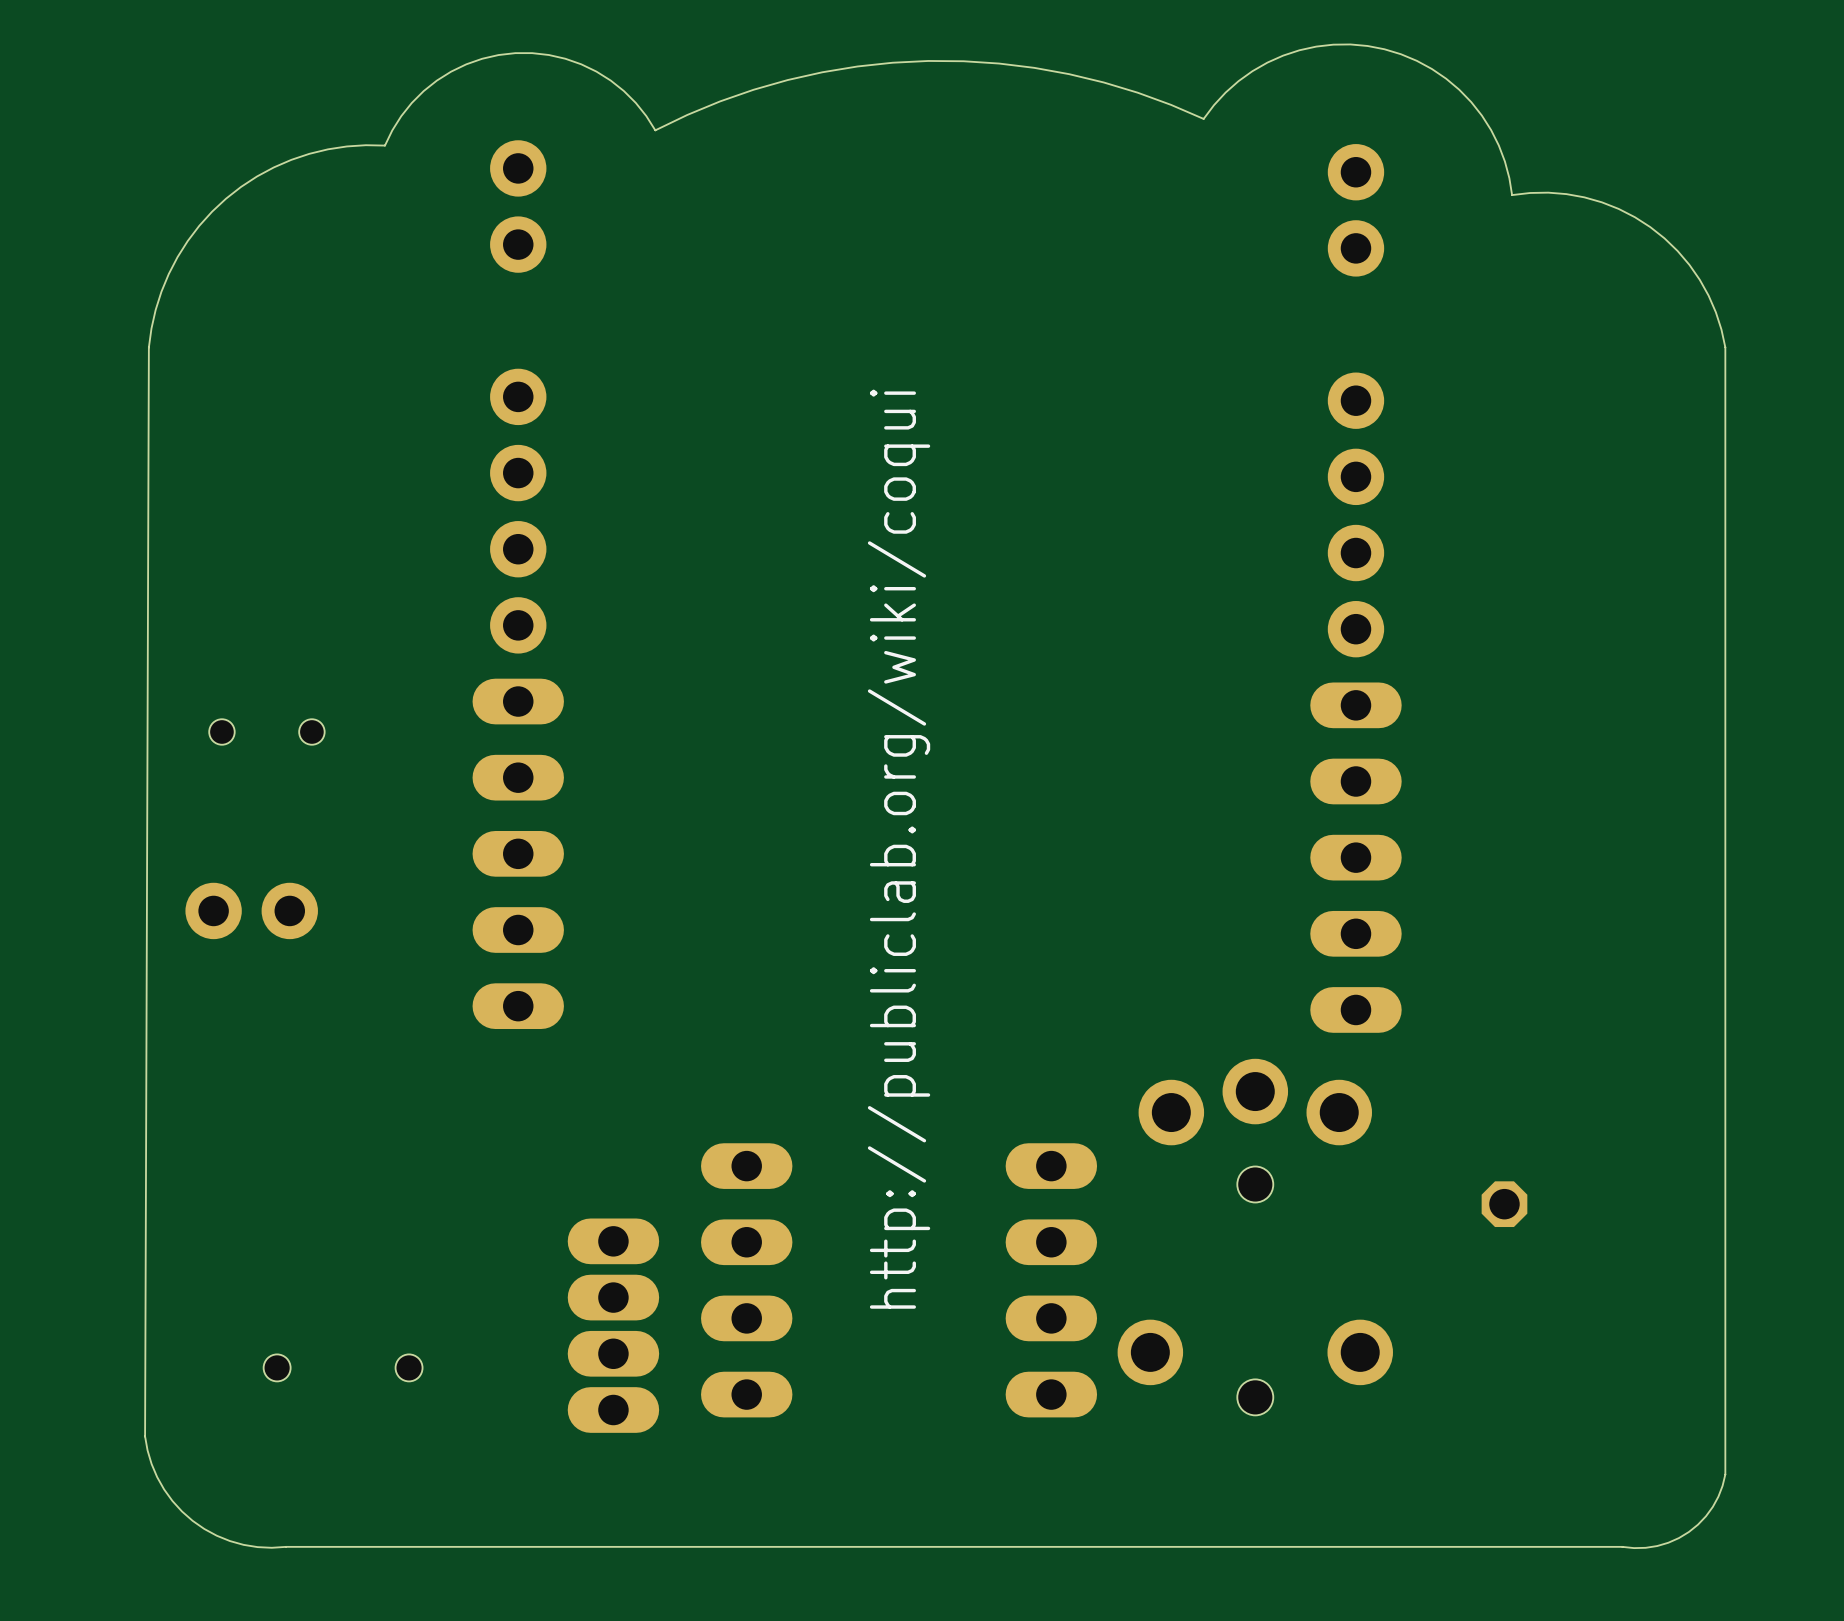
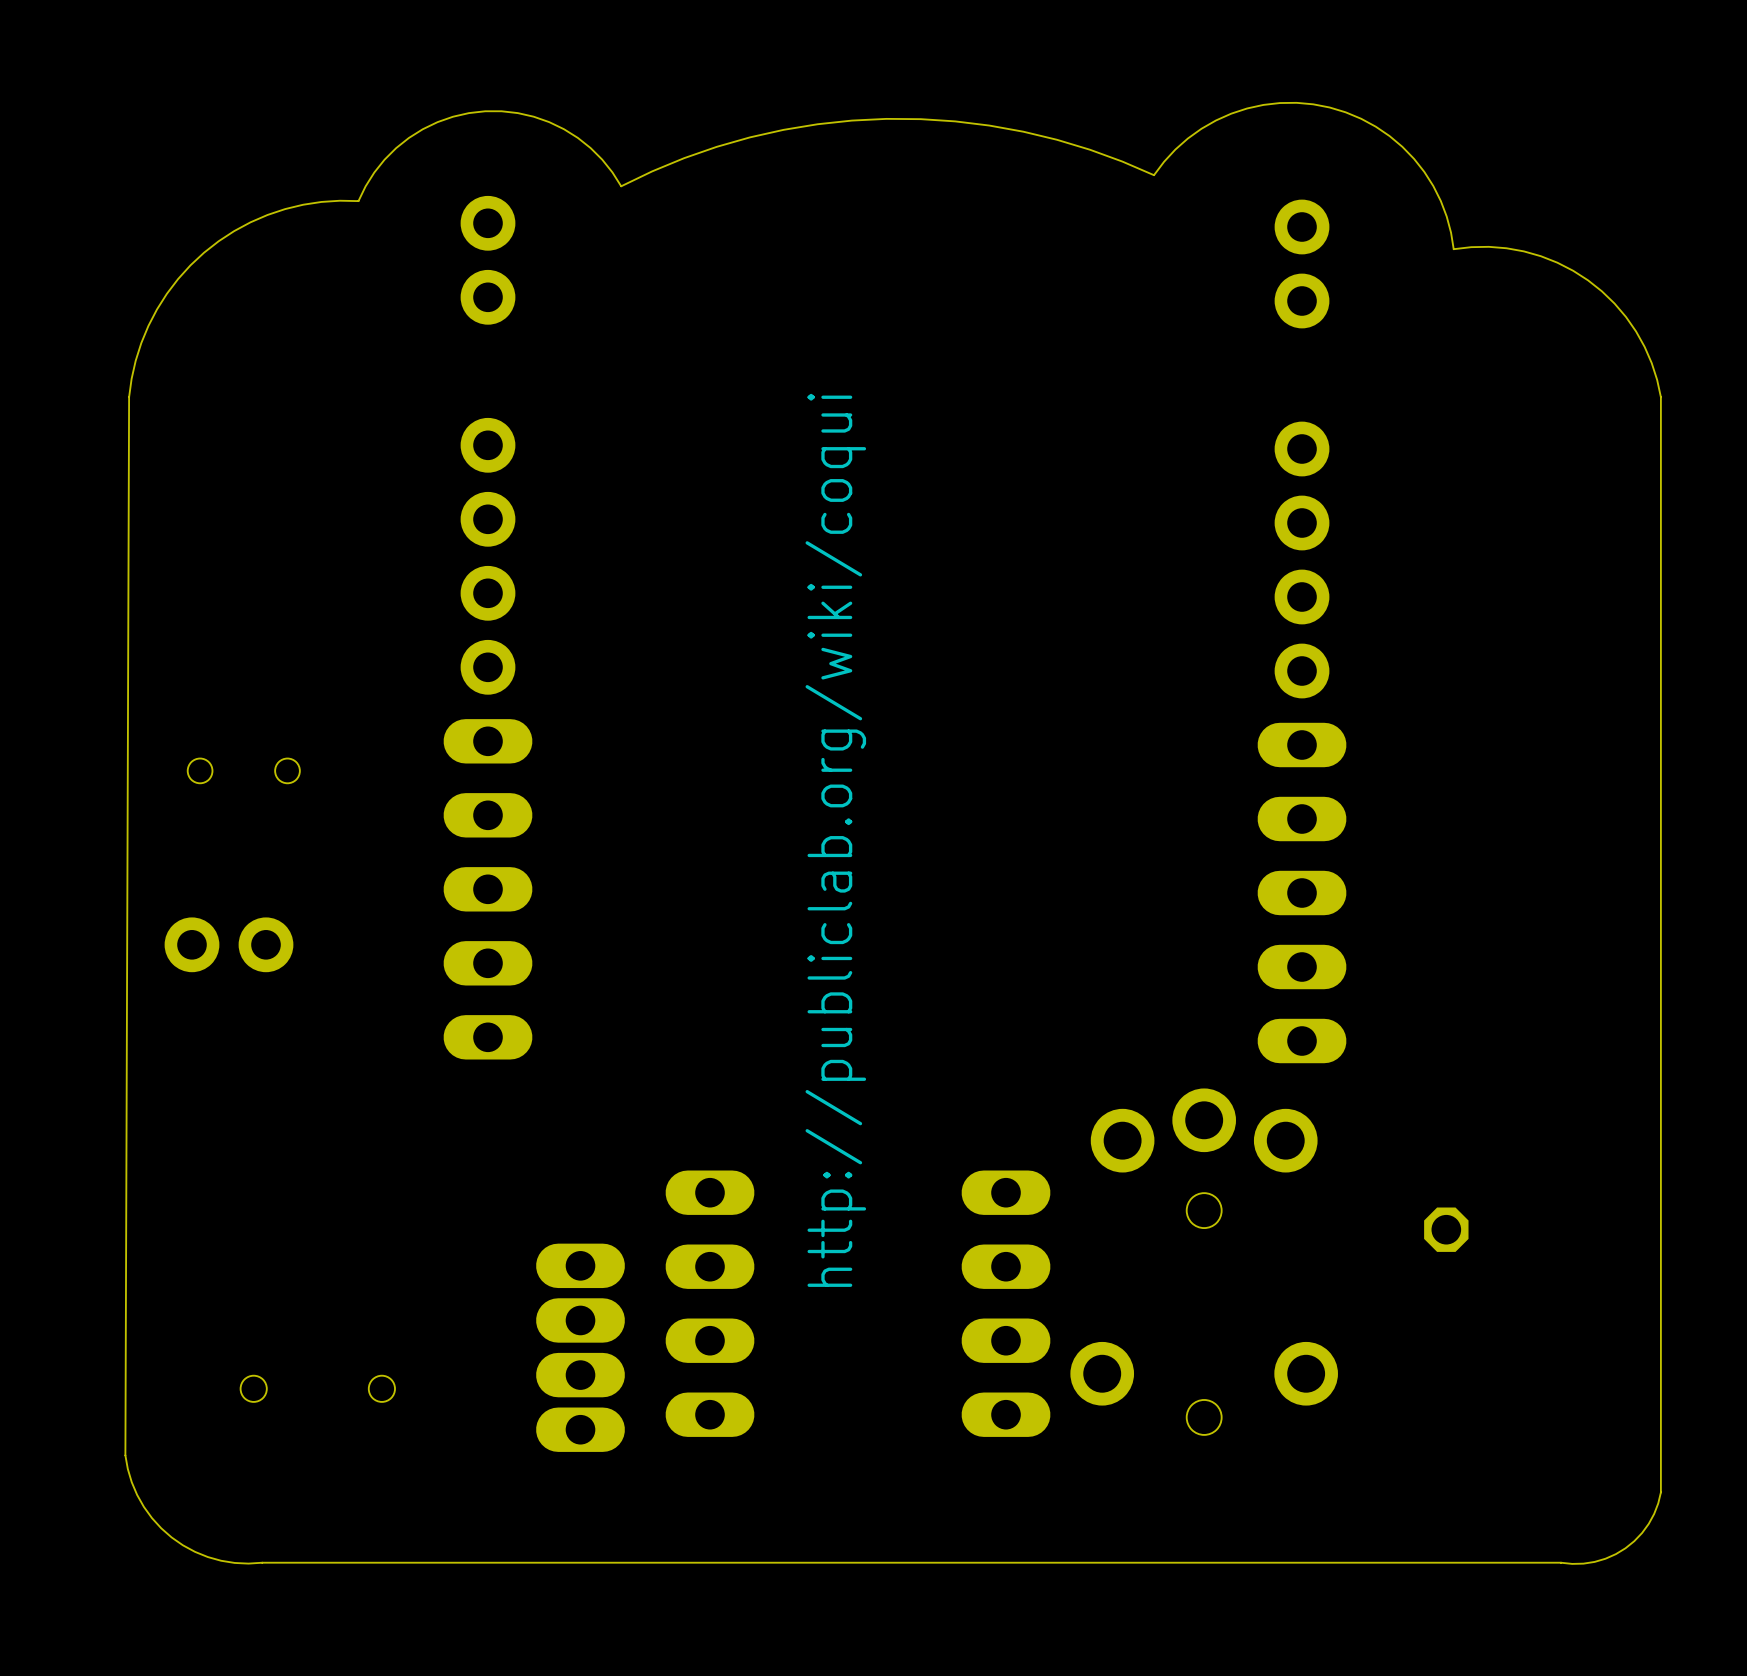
text position: http://publiclab.org/wiki/coqui (899, 849) -> http://publiclab.org/wiki/coqui (835, 840)

